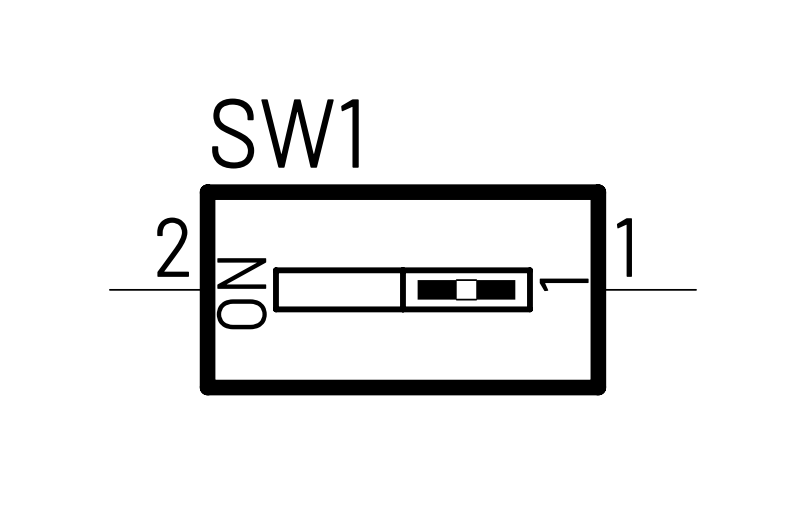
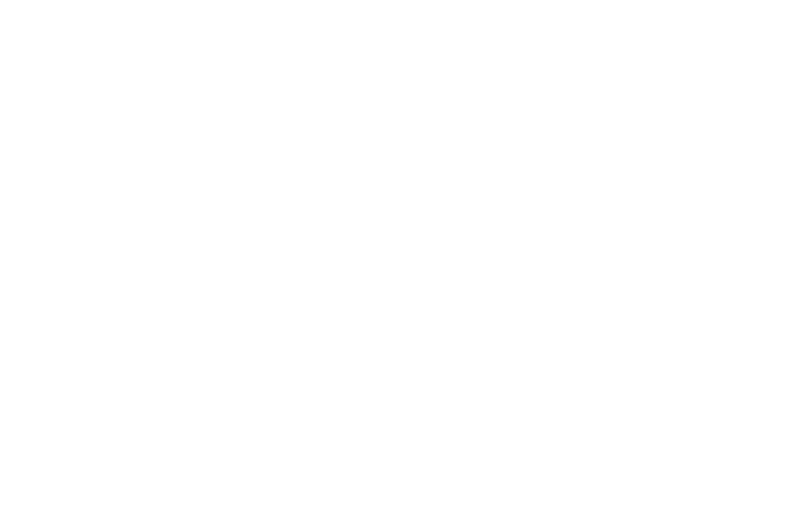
SW1: (402, 289) -> none

